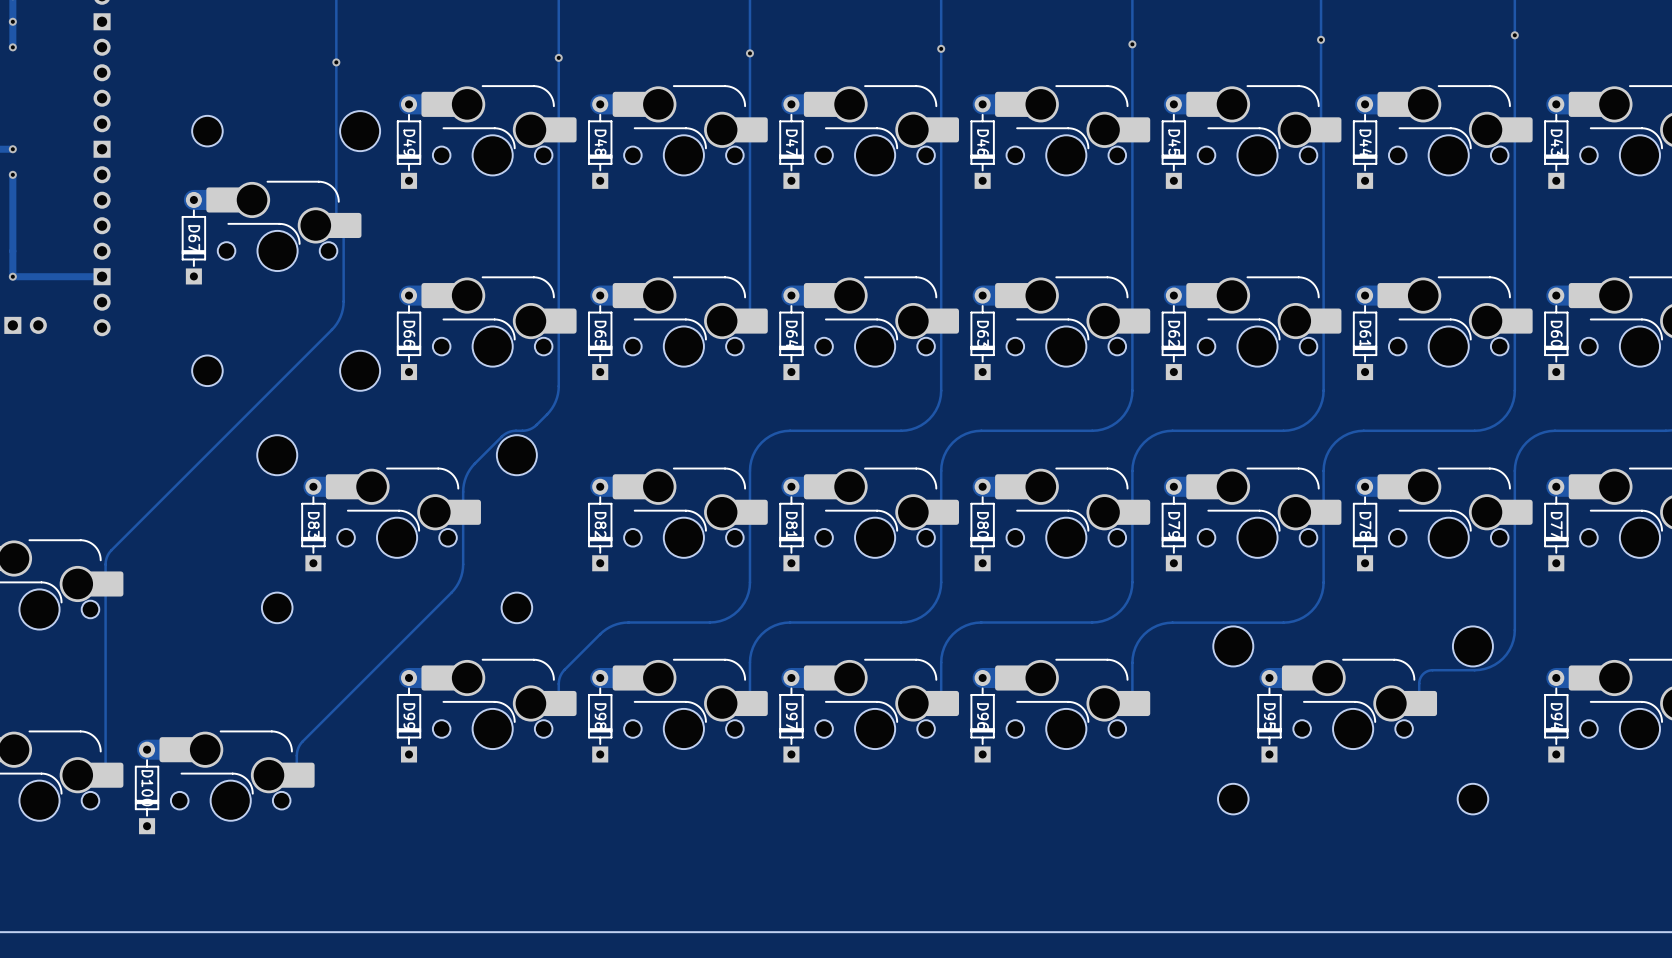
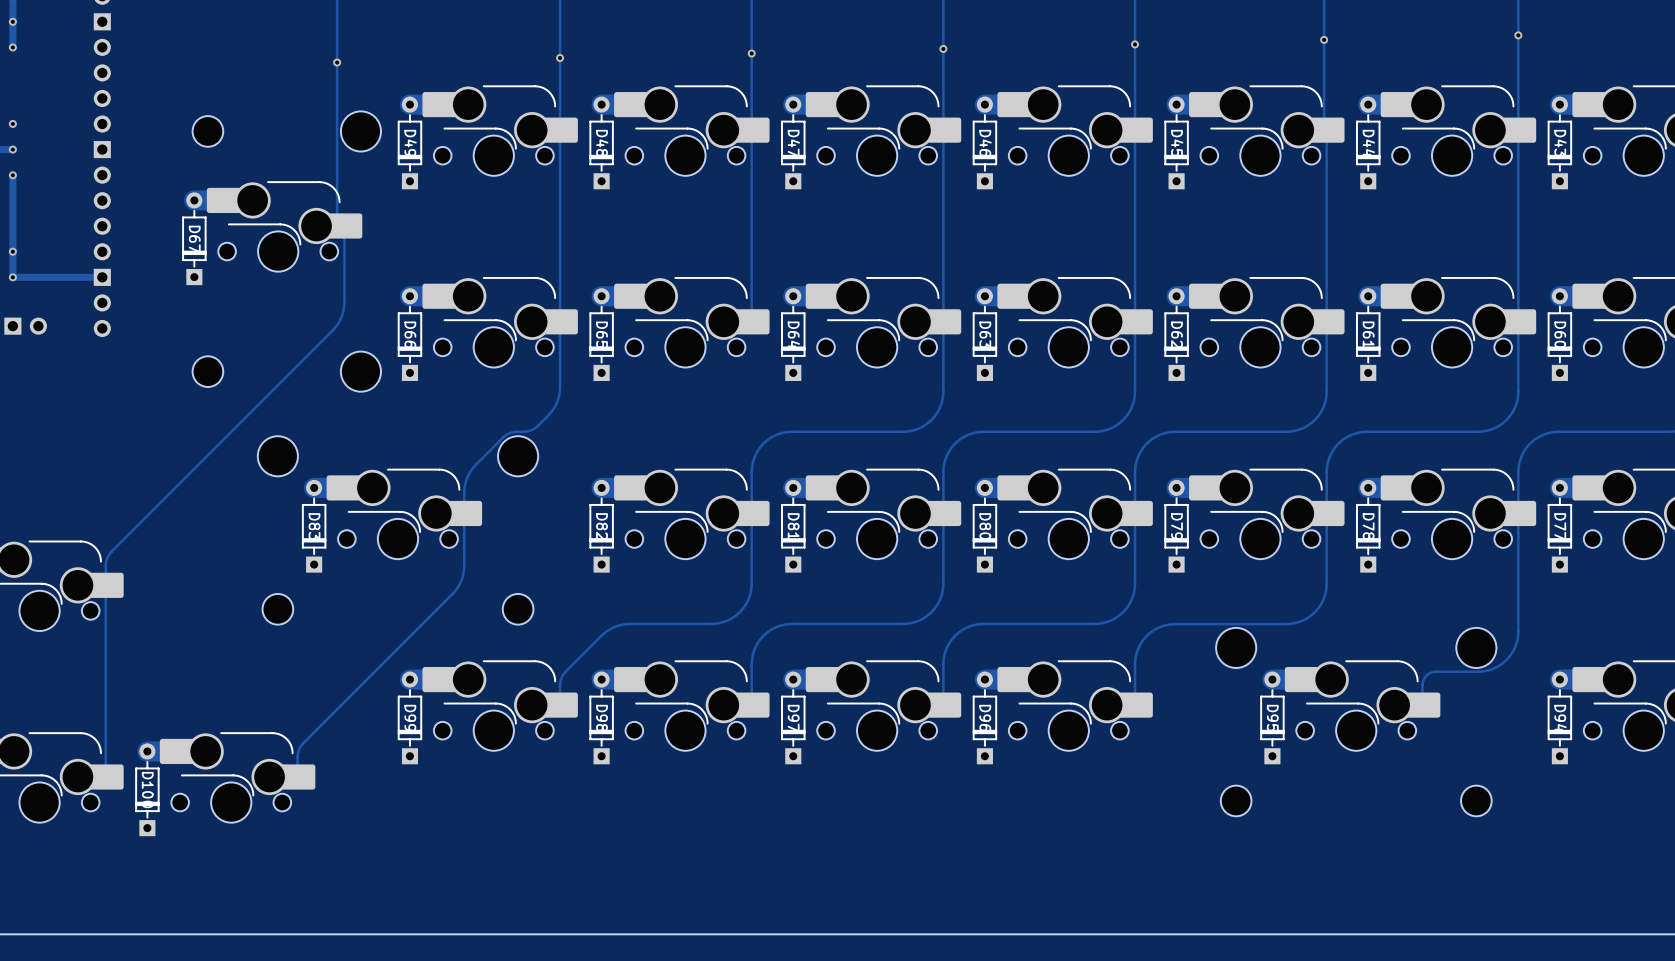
via: none -> (12, 123)
via: none -> (12, 251)

